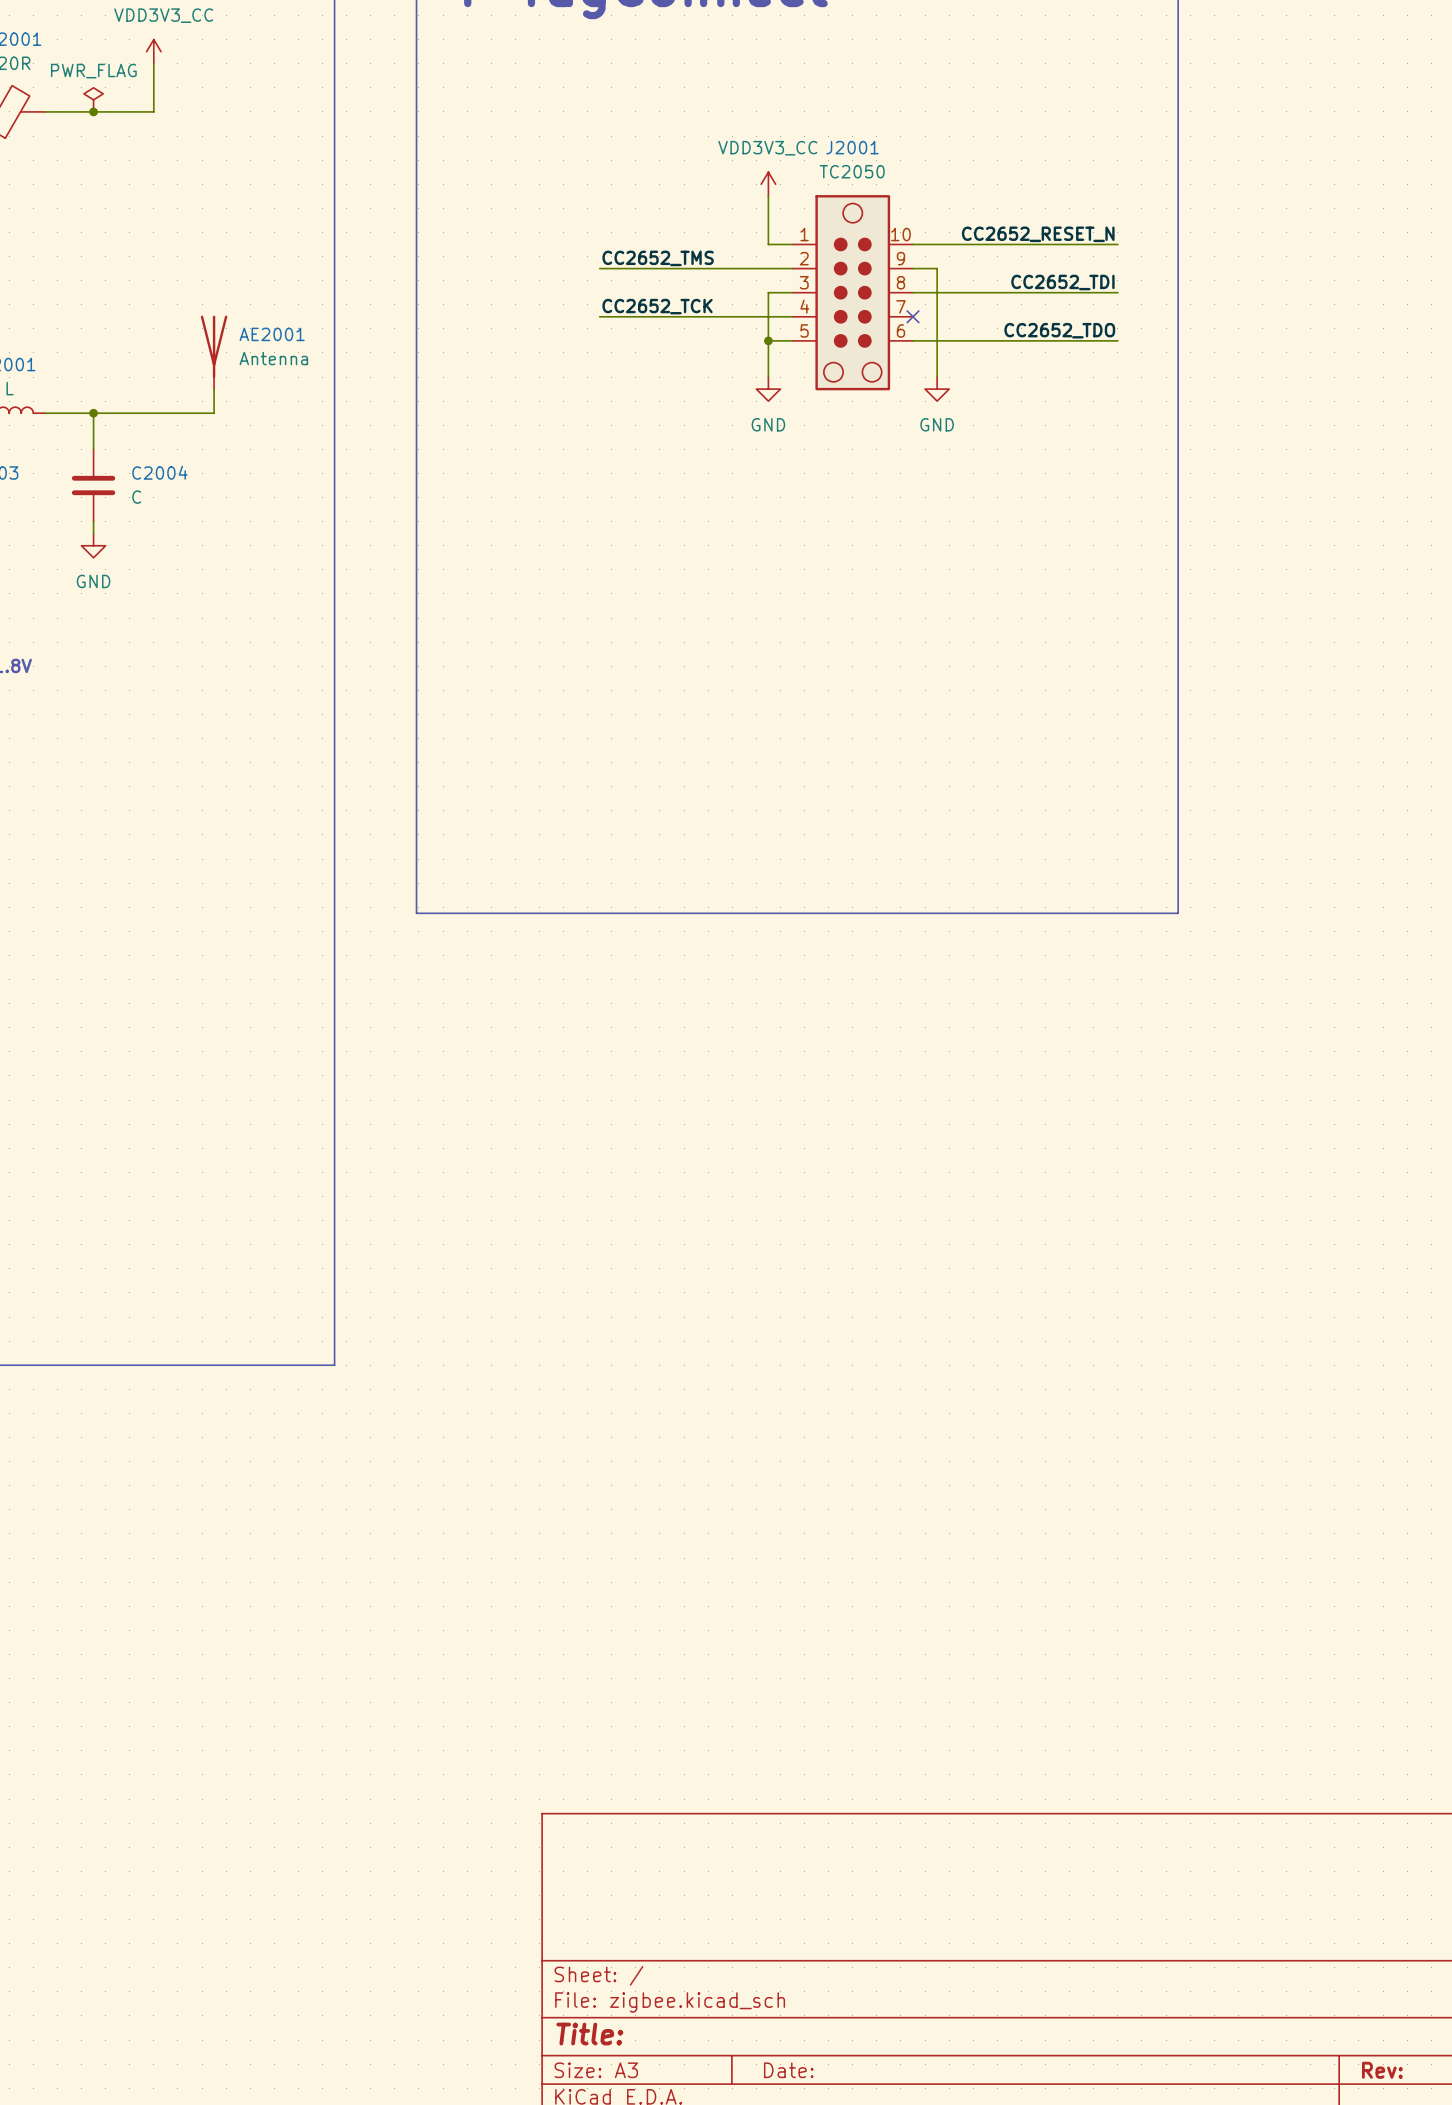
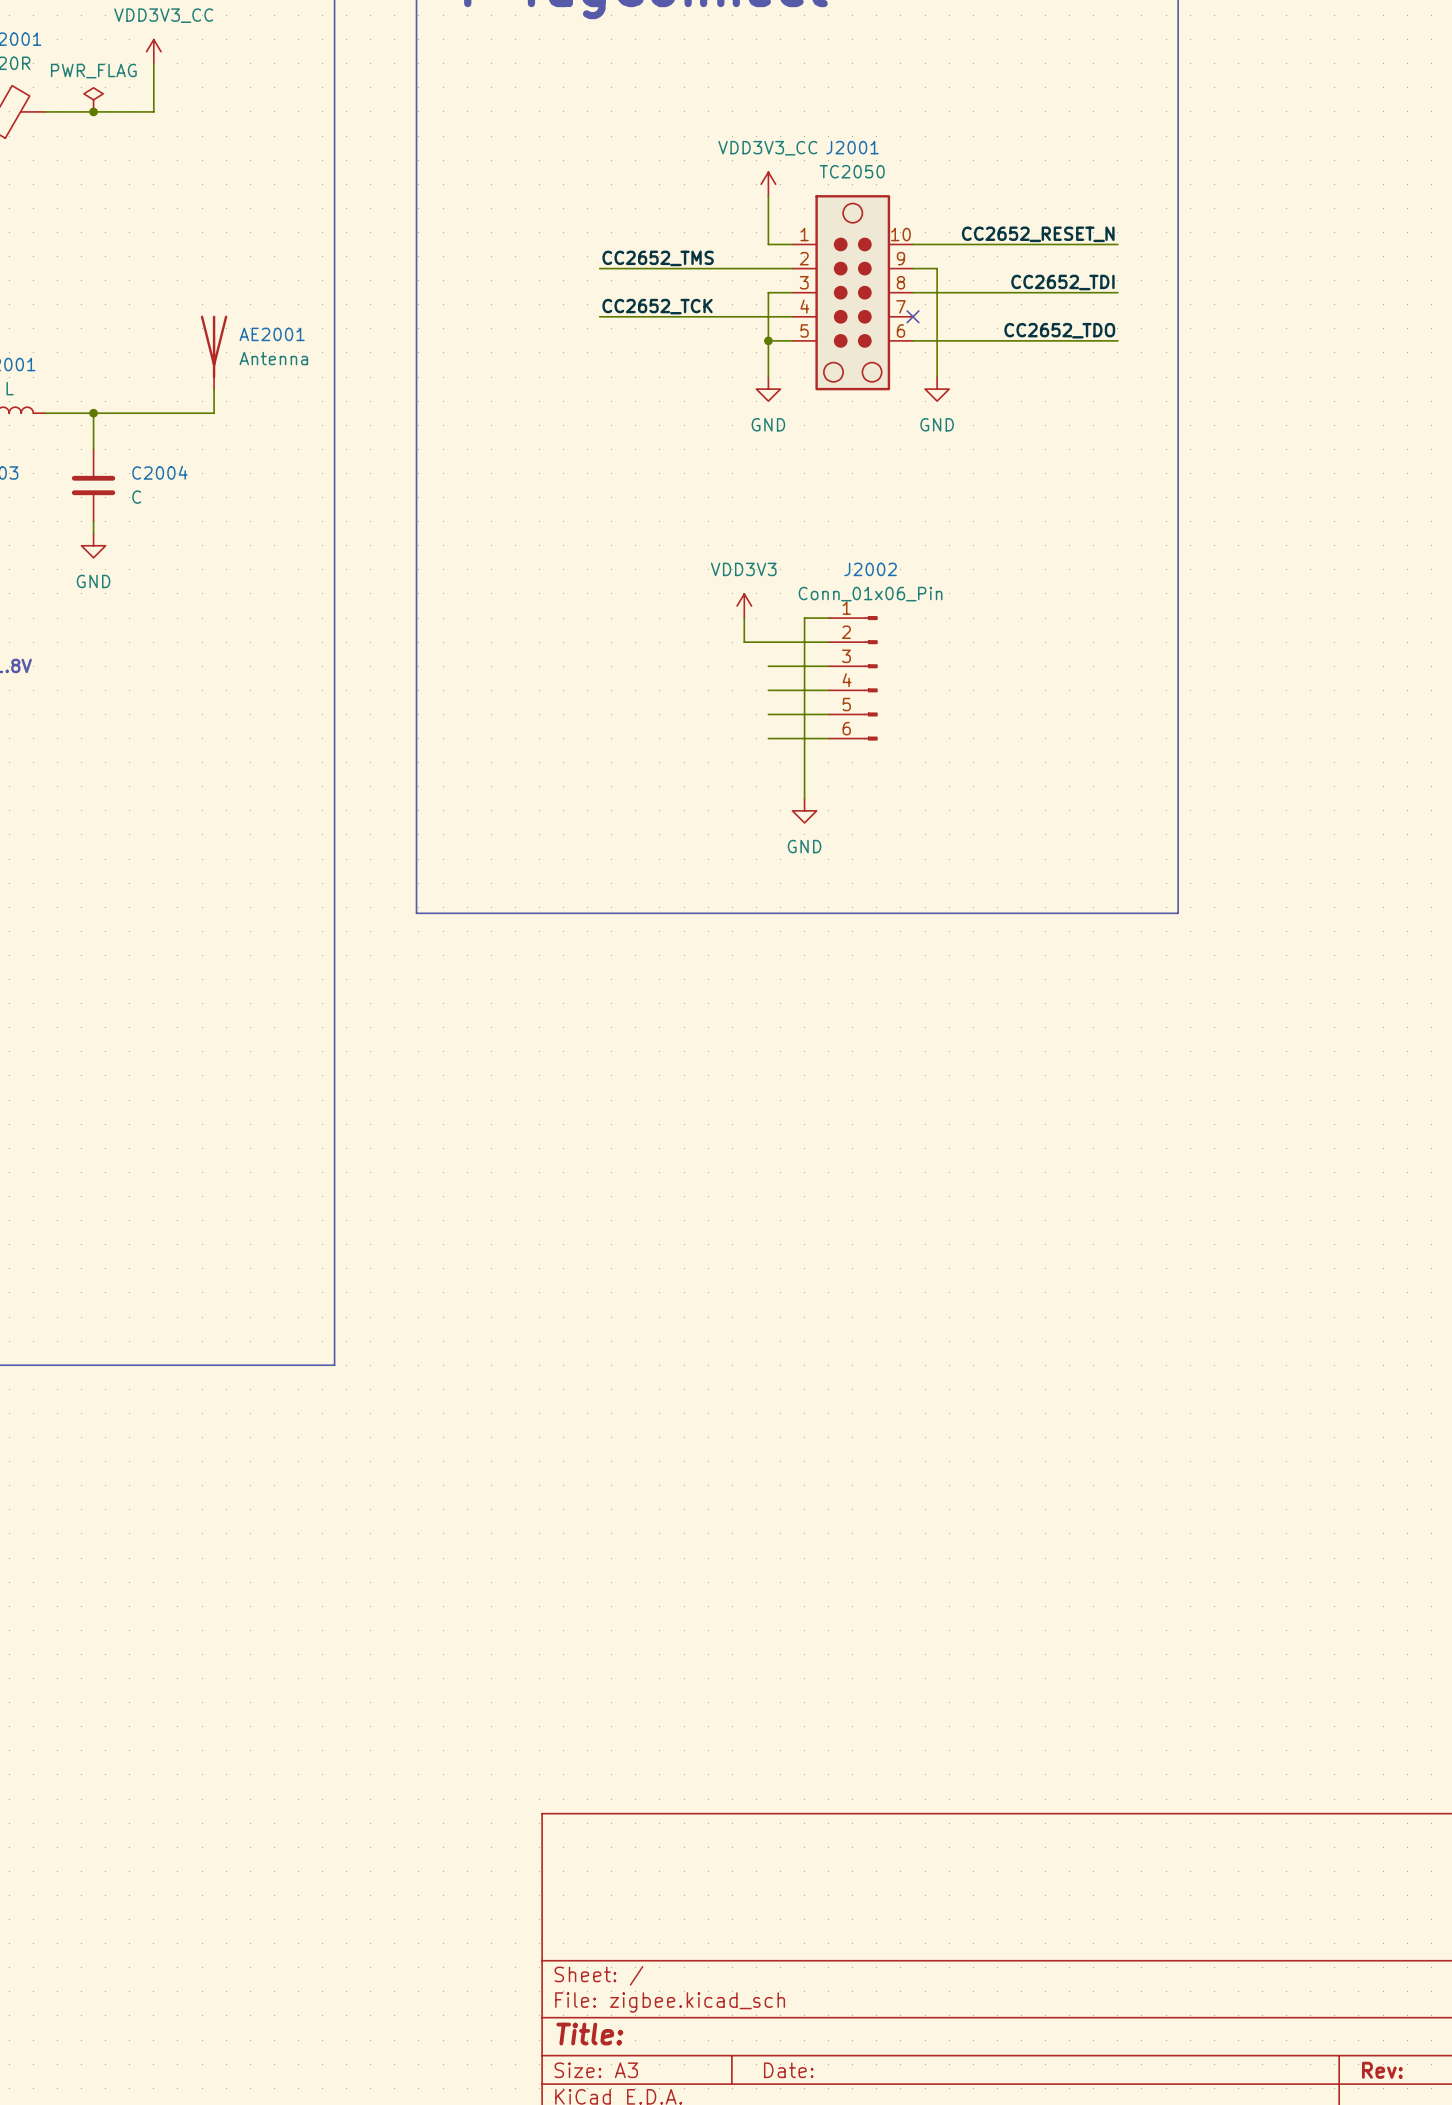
power symbol: none -> VDD3V3 (744, 606)
wire: none -> (744, 618) (744, 642) (828, 642)
wire: none -> (828, 618) (804, 618) (804, 798)
wire: none -> (768, 666) (828, 666)
J2002: none -> Conn_01x06_Pin (853, 678)
wire: none -> (768, 690) (828, 690)
wire: none -> (768, 714) (828, 714)
wire: none -> (768, 738) (828, 738)
power symbol: none -> GND (804, 810)

